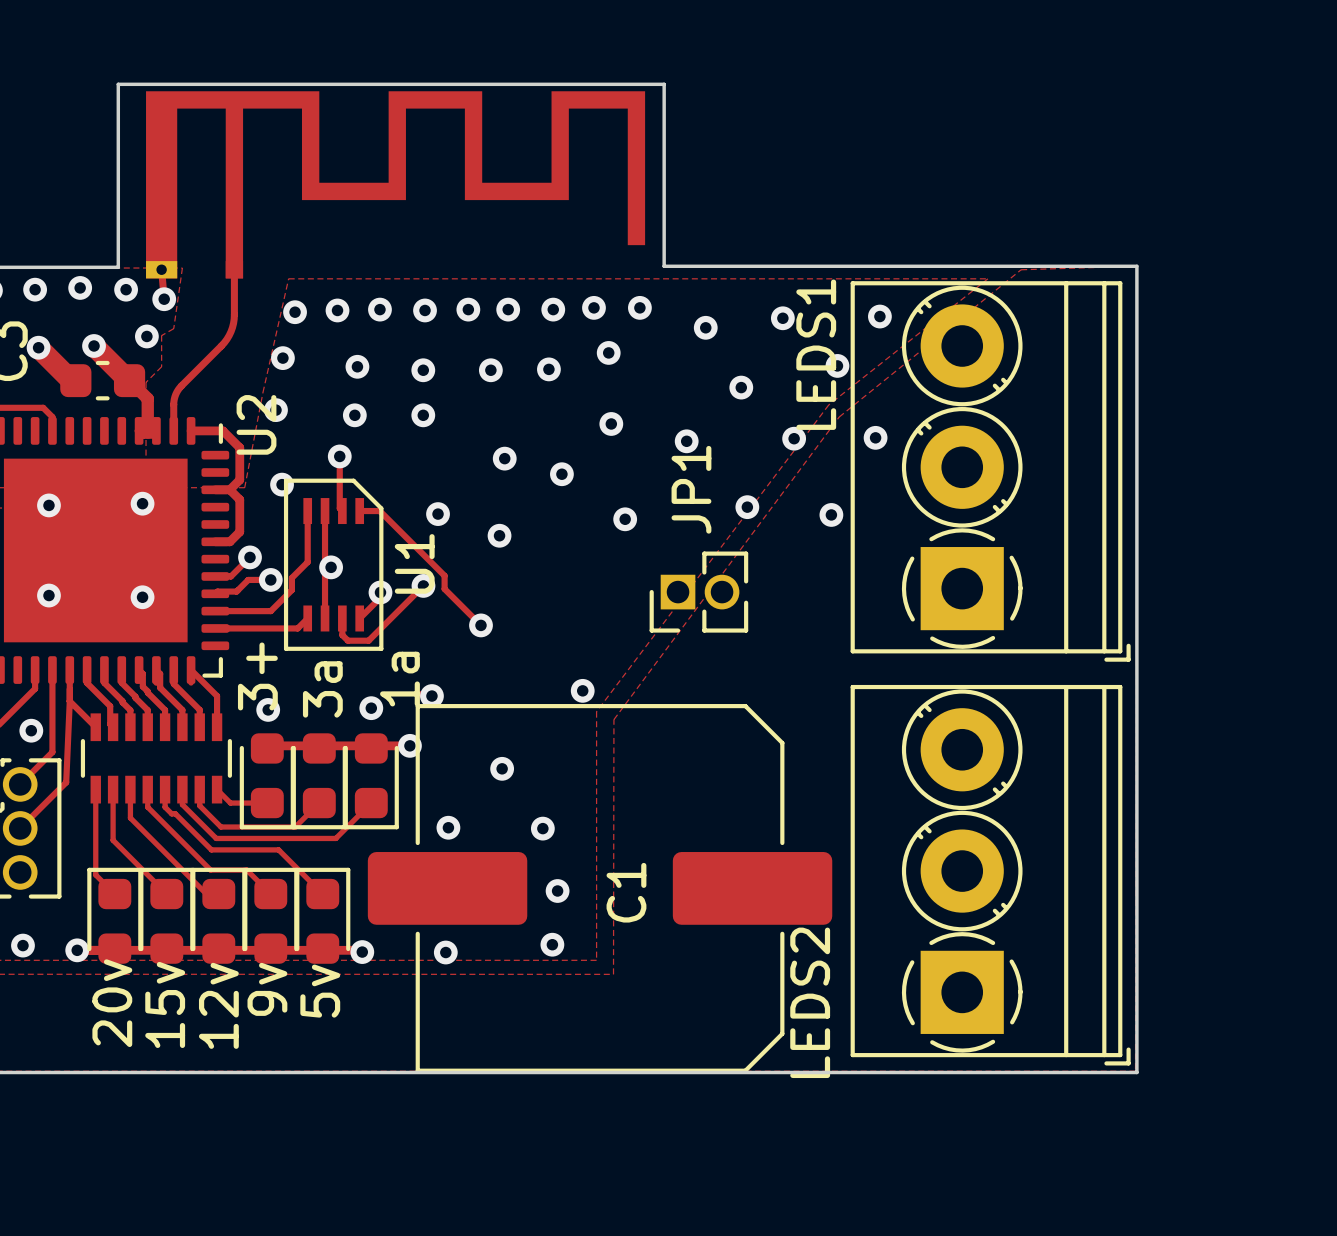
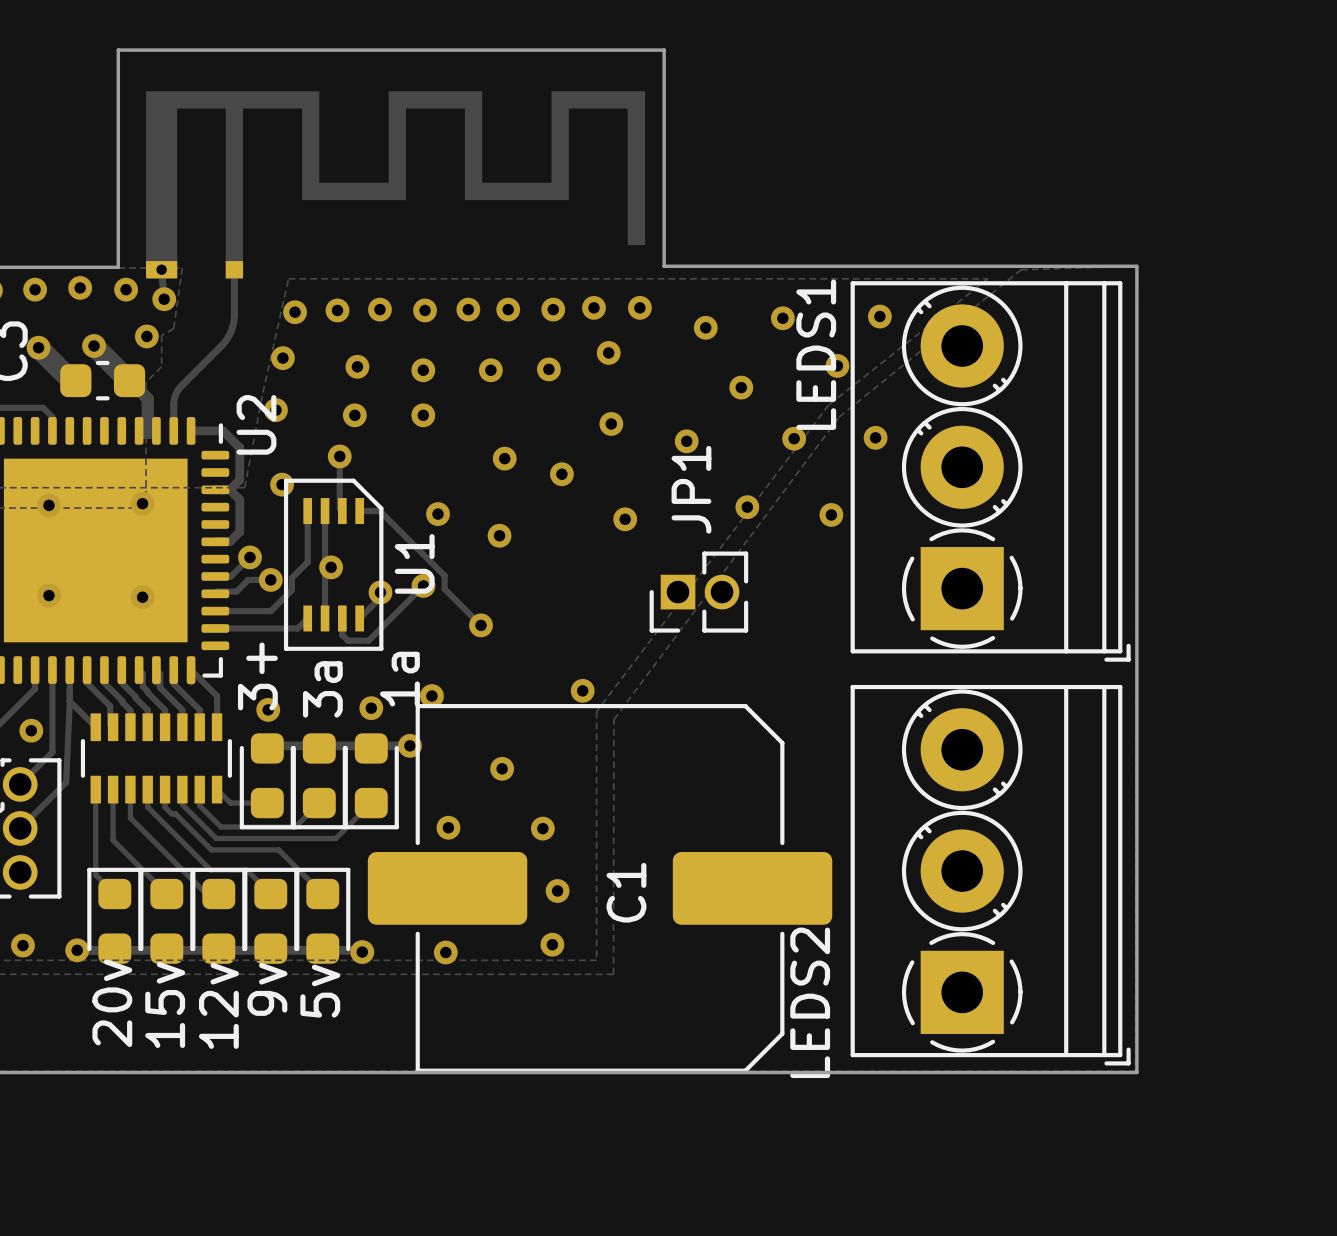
board edge: (118, 84) (664, 84) -> (118, 84) (118, 50) (664, 50) (664, 84)

